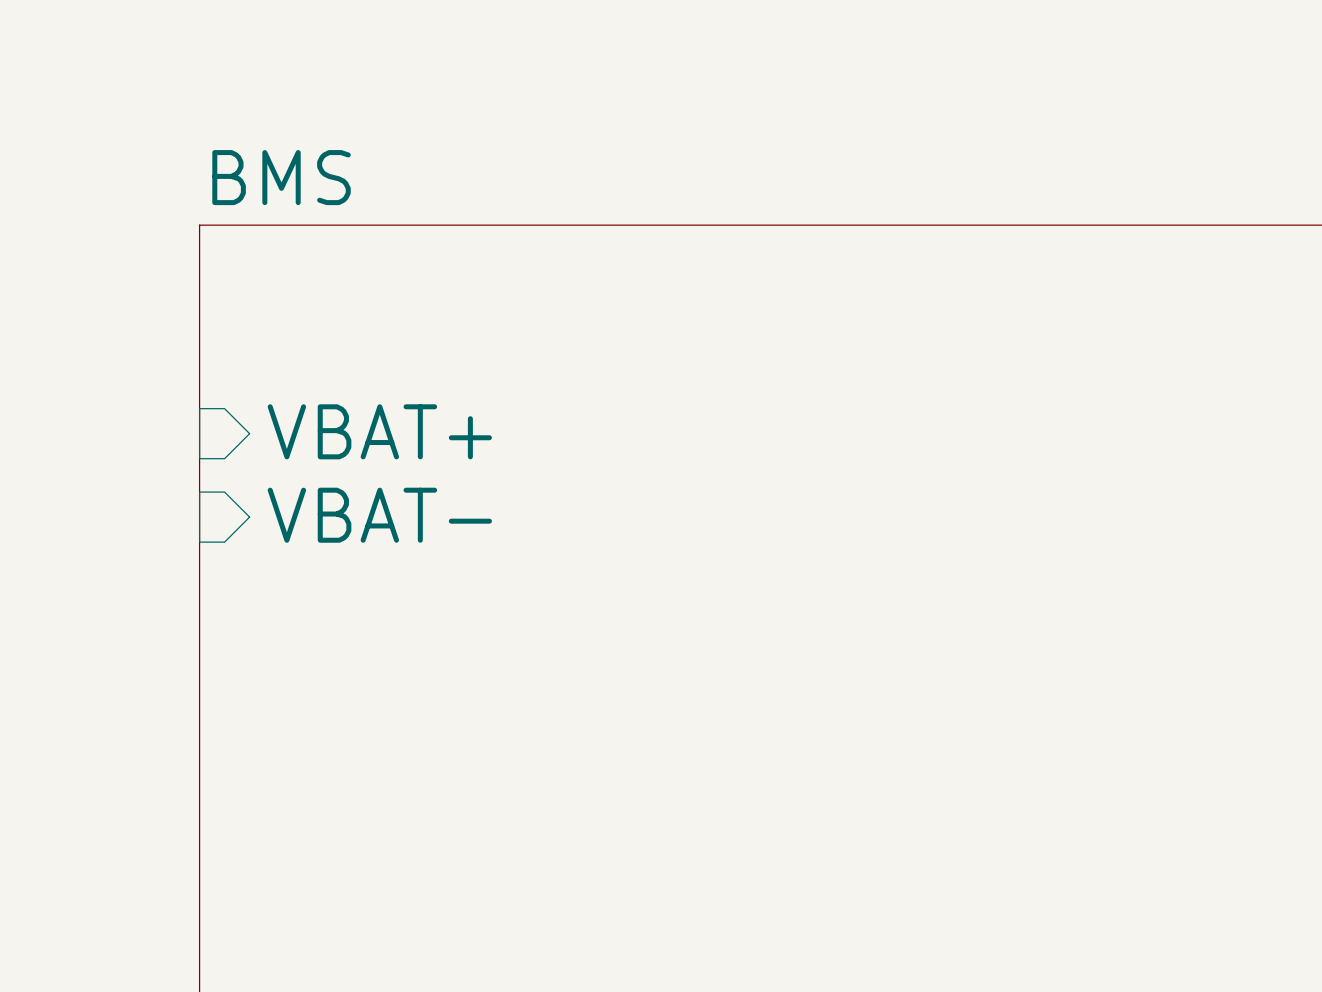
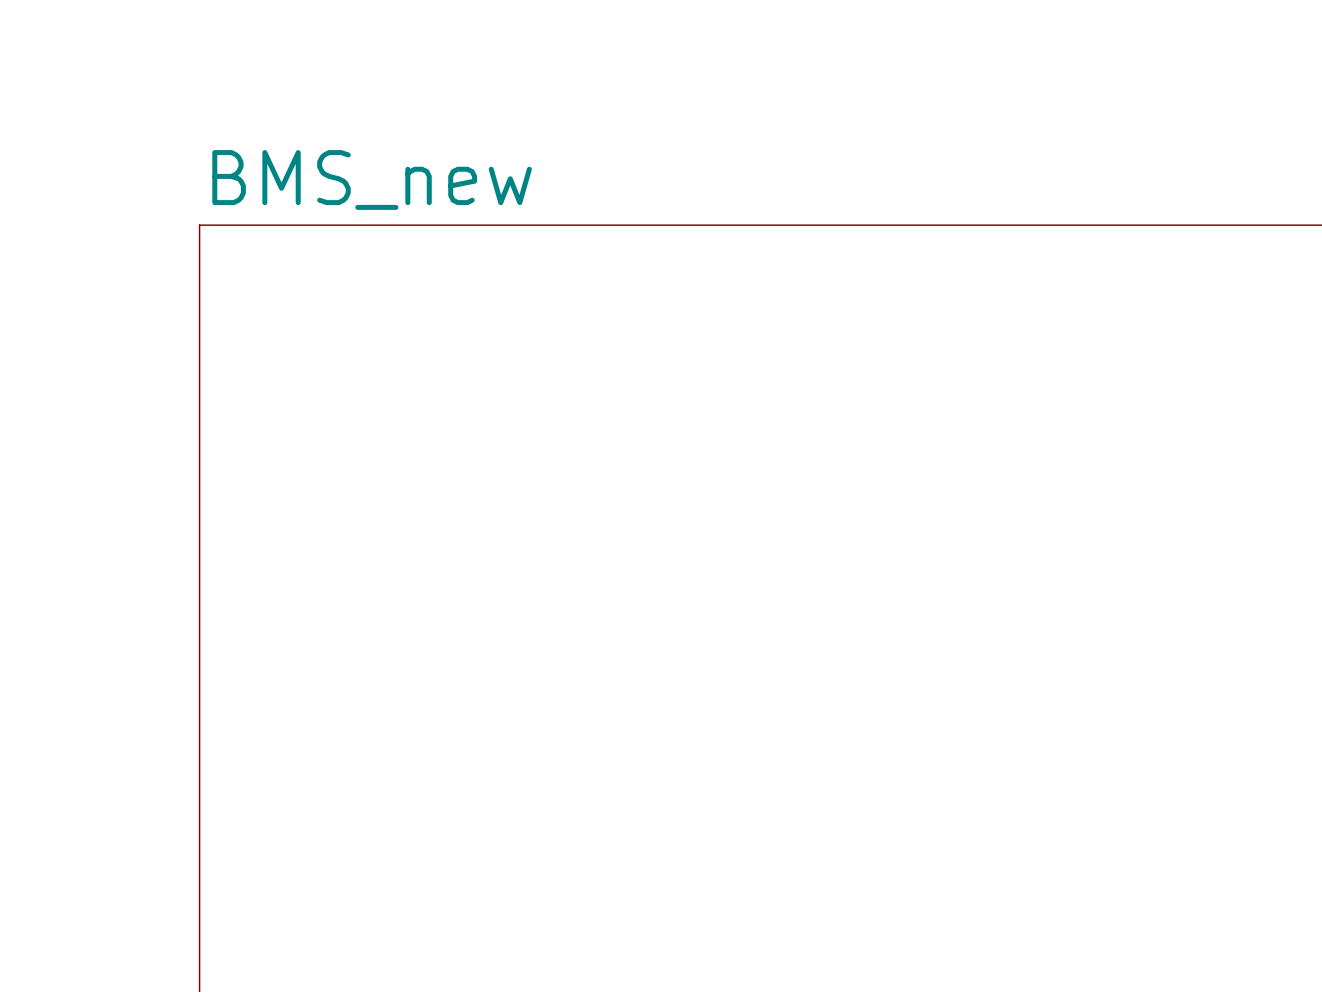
sheet BMS name: BMS (281, 177) -> BMS_new (372, 179)
sheet pin: VBAT+ (379, 431) -> none
sheet pin: VBAT- (379, 515) -> none

